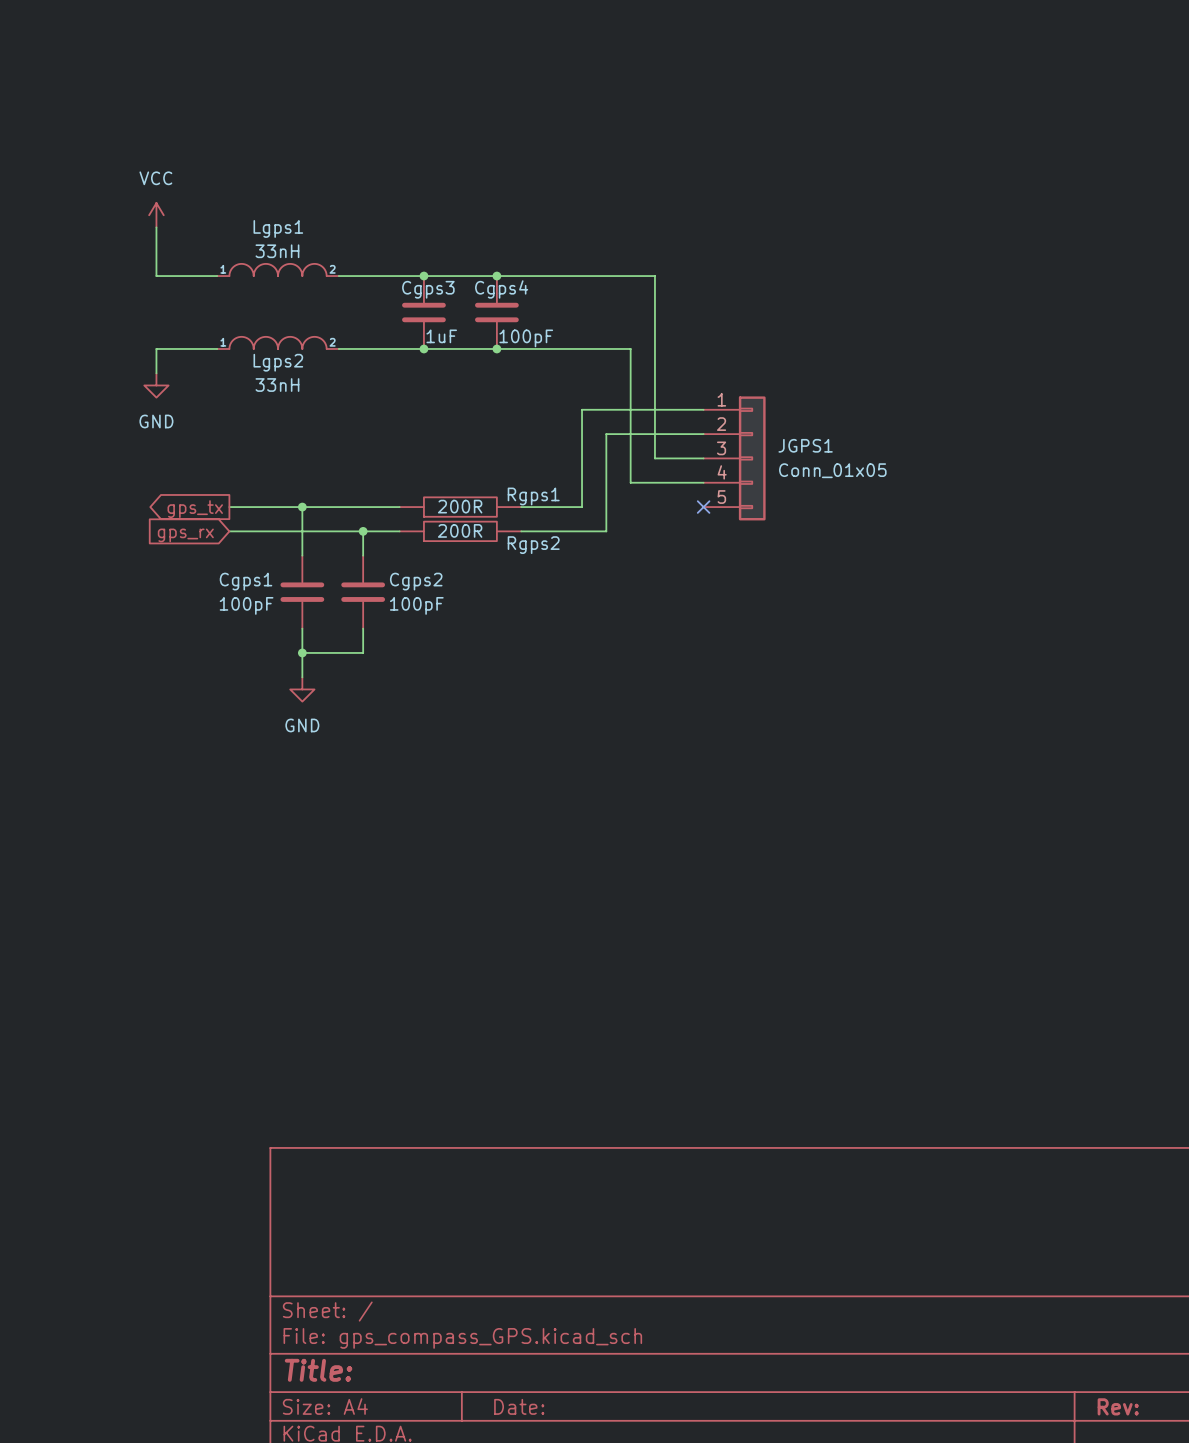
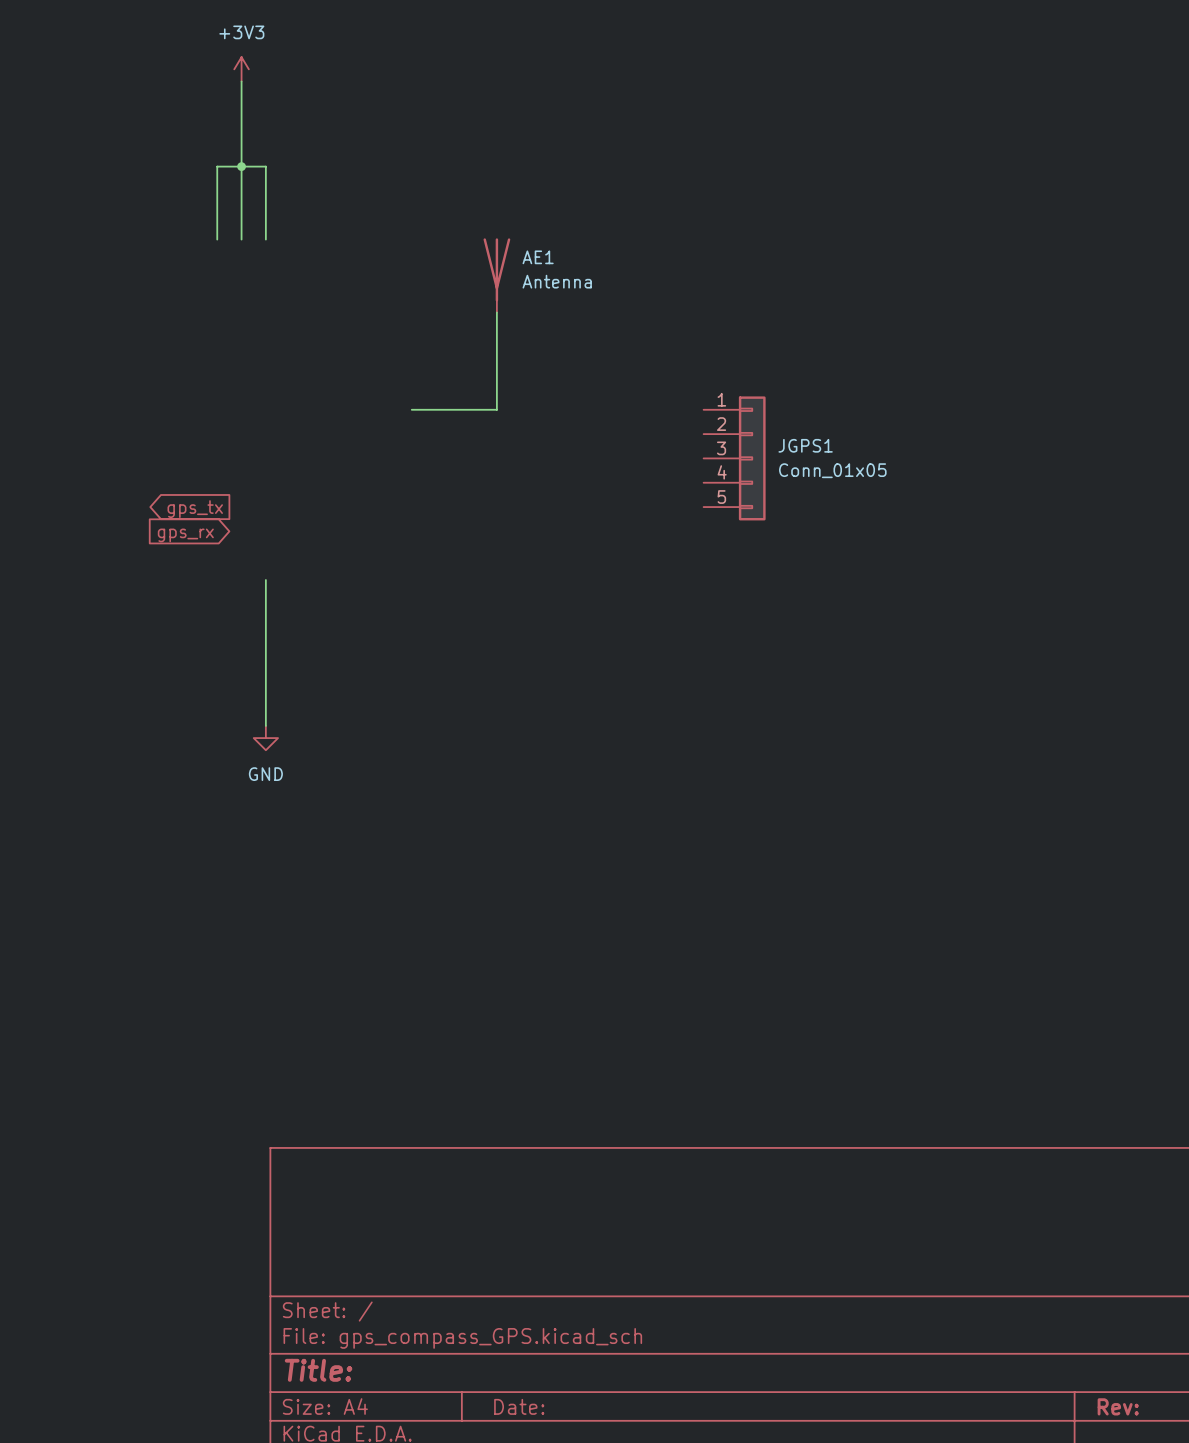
power symbol: none -> +3V3 (241, 69)
wire: none -> (241, 81) (241, 239)
junction: none -> (241, 166)
power symbol: VCC (156, 215) -> none
wire: (156, 227) (156, 276) (217, 276) -> none
wire: none -> (217, 239) (217, 166) (265, 166) (265, 239)
Lgps1: 33nH (278, 269) -> none
AE1: none -> Antenna (496, 275)
wire: (338, 276) (654, 276) (654, 458) (703, 458) -> none
junction: (423, 276) -> none
junction: (496, 276) -> none
Cgps3: 1uF (423, 312) -> none
wire: none -> (496, 312) (496, 409) (411, 409)
Cgps4: 100pF (496, 312) -> none
Lgps2: 33nH (278, 342) -> none
wire: (217, 348) (156, 348) (156, 373) -> none
wire: (338, 348) (630, 348) (630, 482) (703, 482) -> none
junction: (423, 348) -> none
junction: (496, 348) -> none
power symbol: GND (156, 385) -> none
wire: (703, 409) (582, 409) (582, 507) (521, 507) -> none
wire: (703, 434) (606, 434) (606, 531) (521, 531) -> none
wire: (229, 507) (399, 507) -> none
wire: (302, 507) (302, 555) -> none
junction: (302, 507) -> none
Rgps1: 200R (460, 507) -> none
no-connect mark: (703, 507) -> none
wire: (229, 531) (399, 531) -> none
wire: (363, 531) (363, 555) -> none
junction: (363, 531) -> none
Rgps2: 200R (460, 531) -> none
wire: none -> (265, 580) (265, 725)
Cgps1: 100pF (302, 592) -> none
Cgps2: 100pF (363, 592) -> none
wire: (302, 628) (302, 677) -> none
wire: (363, 628) (363, 652) (302, 652) -> none
junction: (302, 652) -> none
power symbol position: GND (302, 689) -> GND (265, 738)

